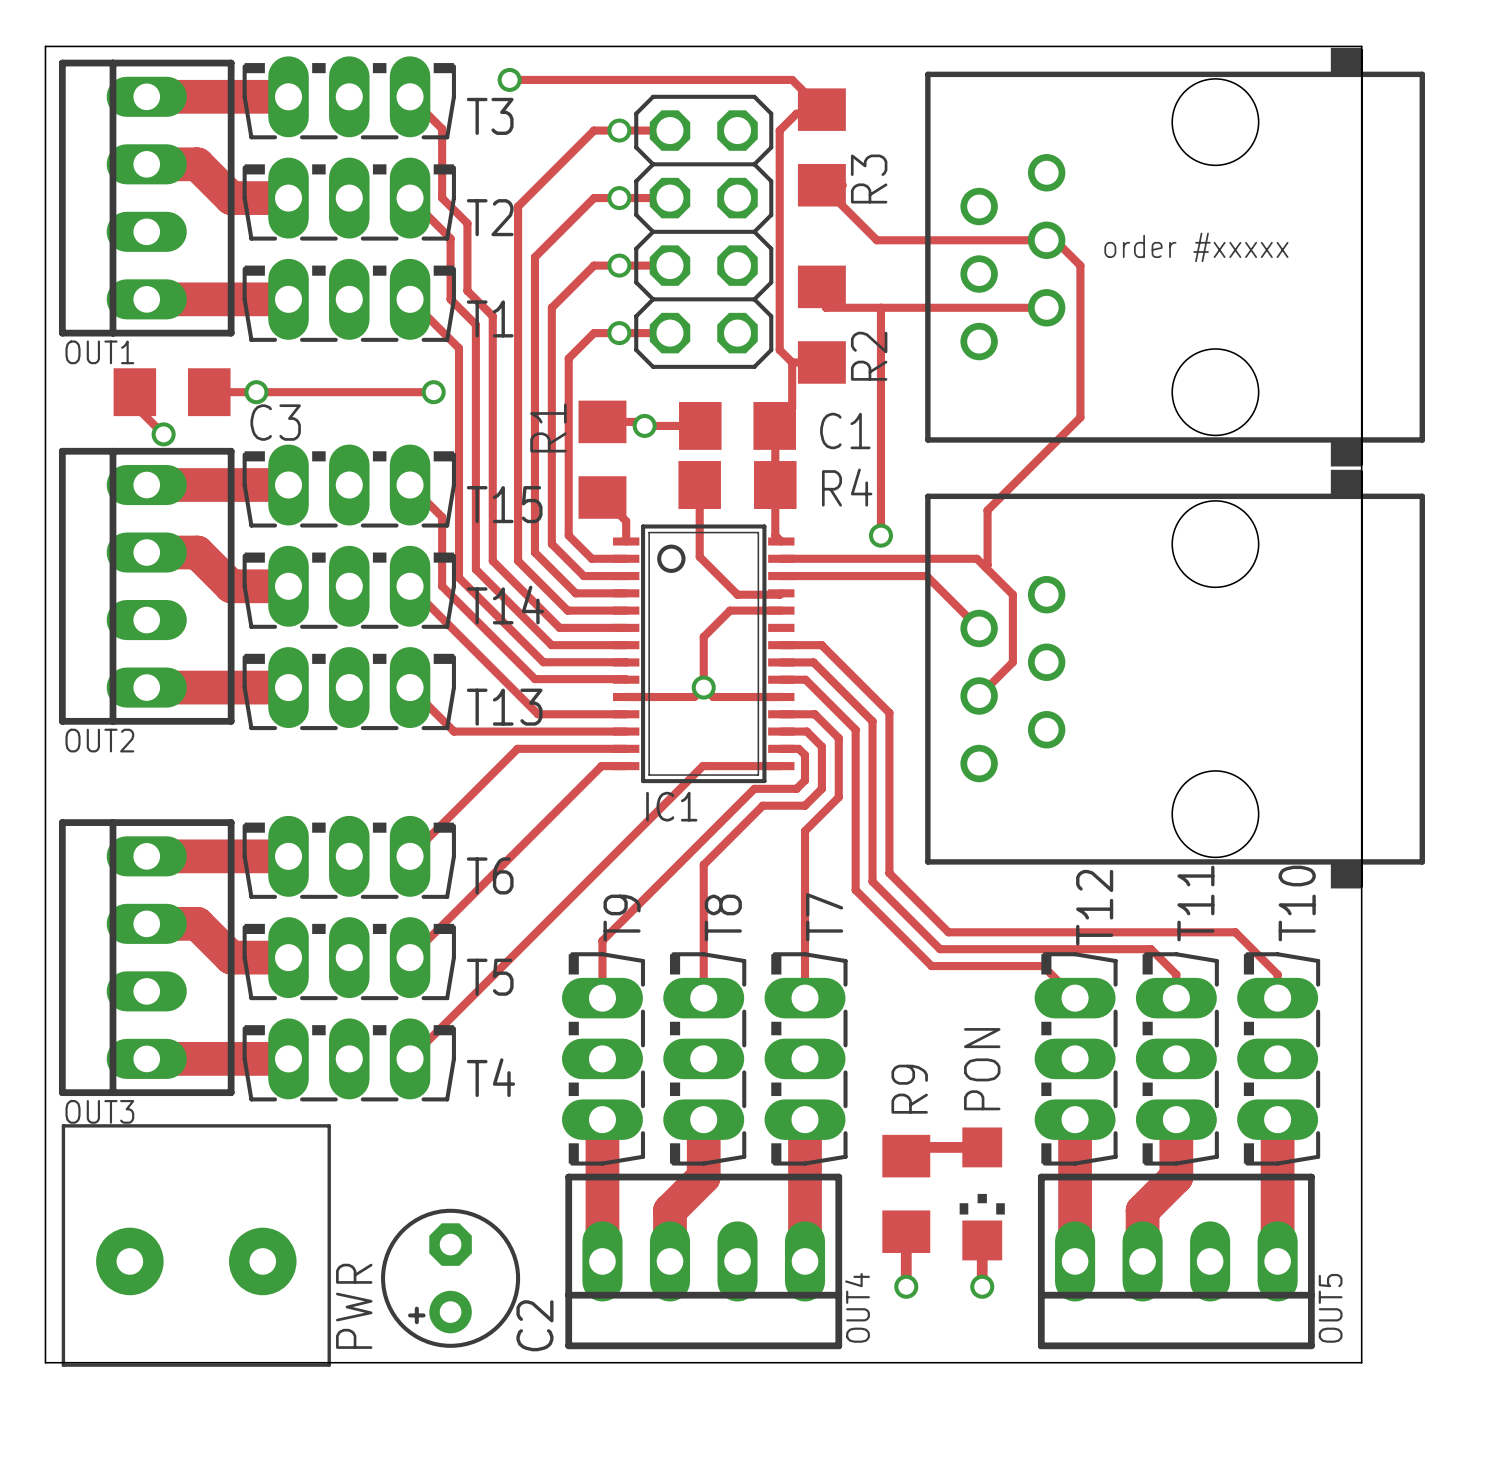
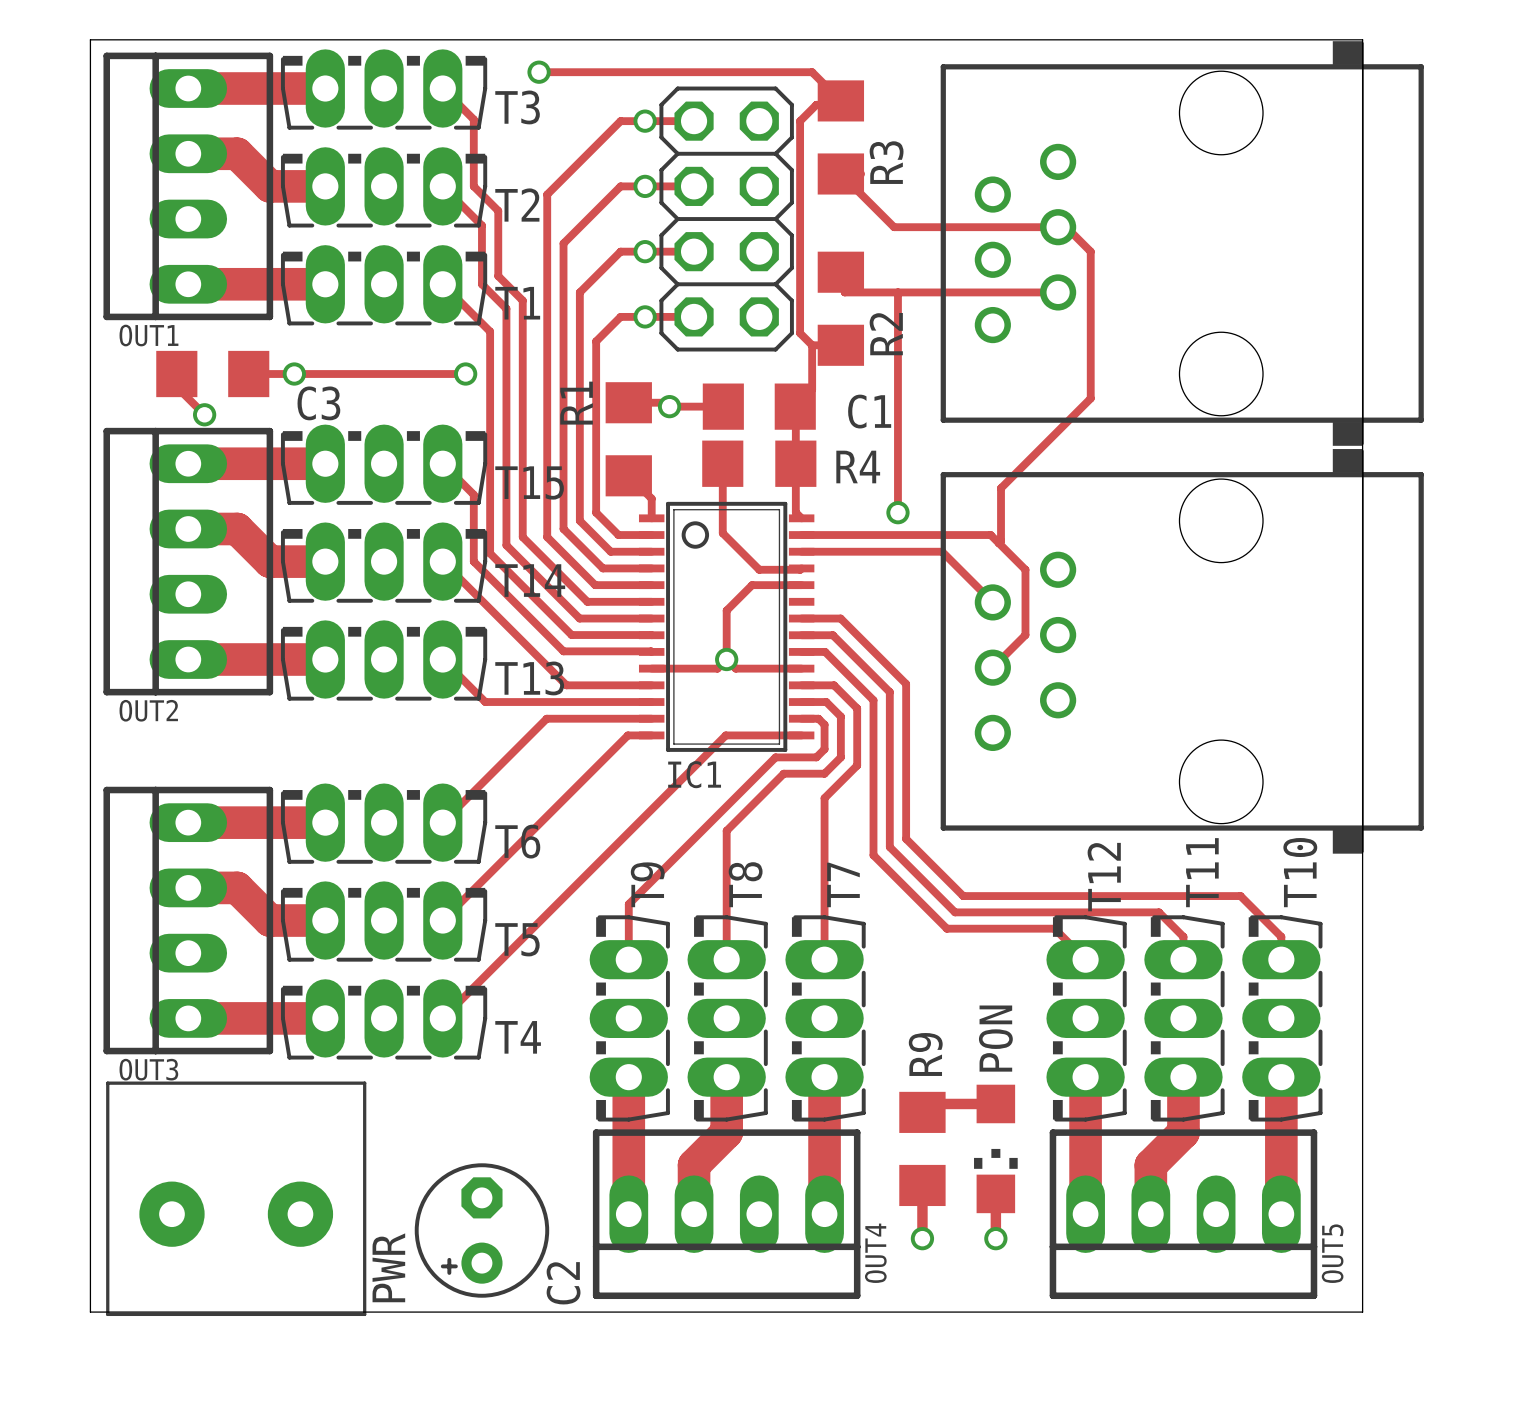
text: order #xxxxx (1196, 247) -> none

